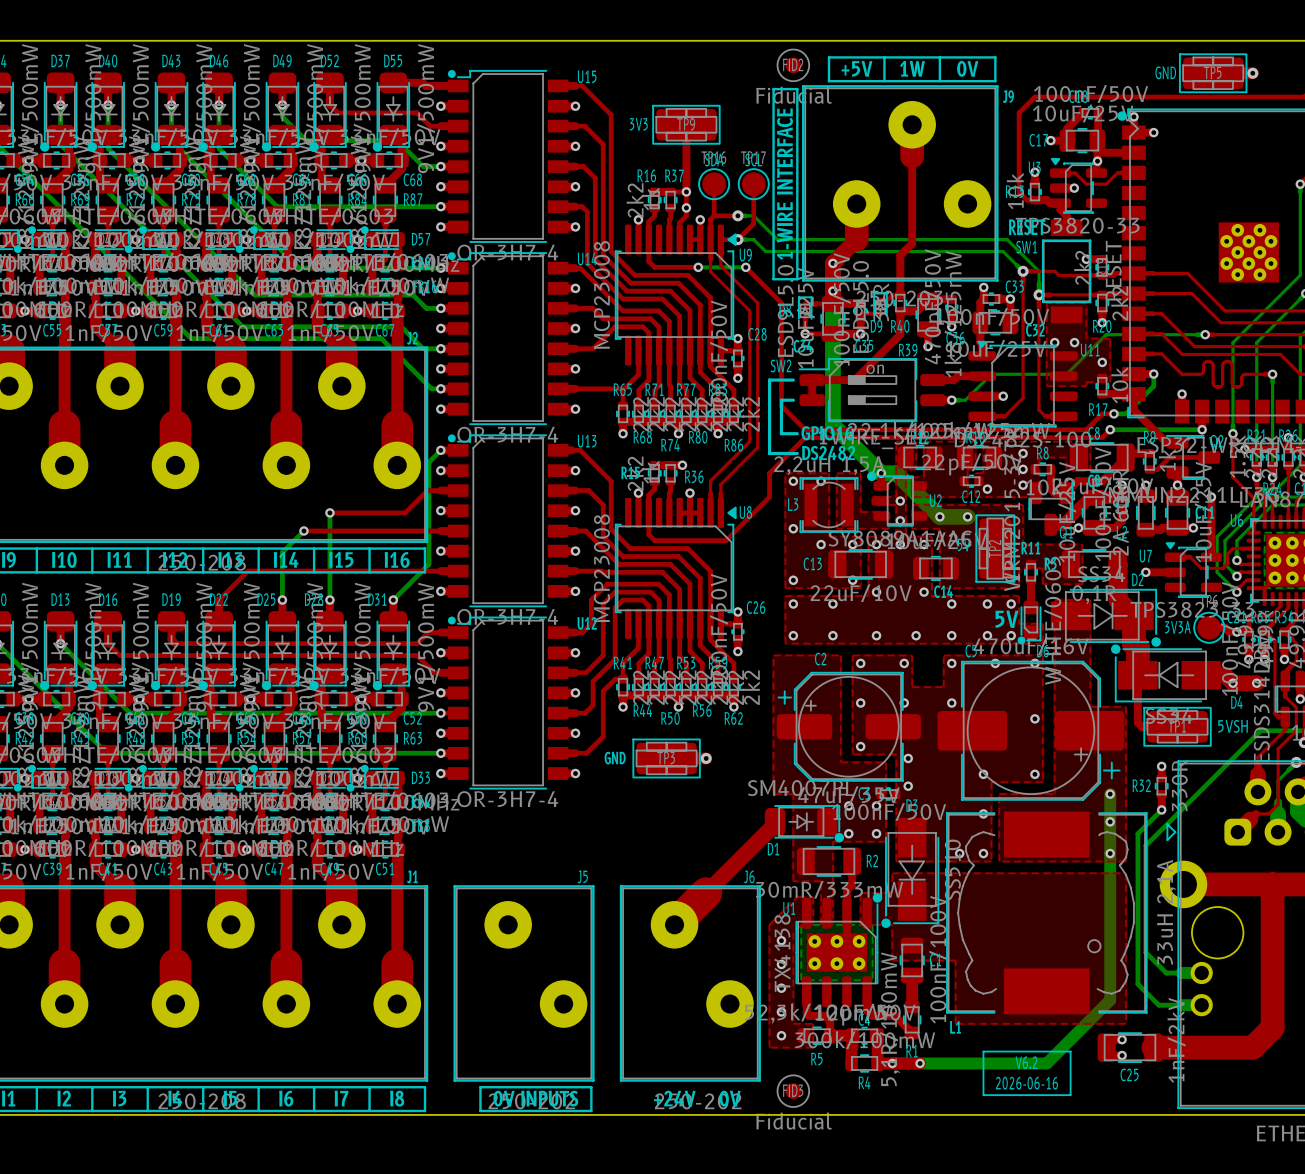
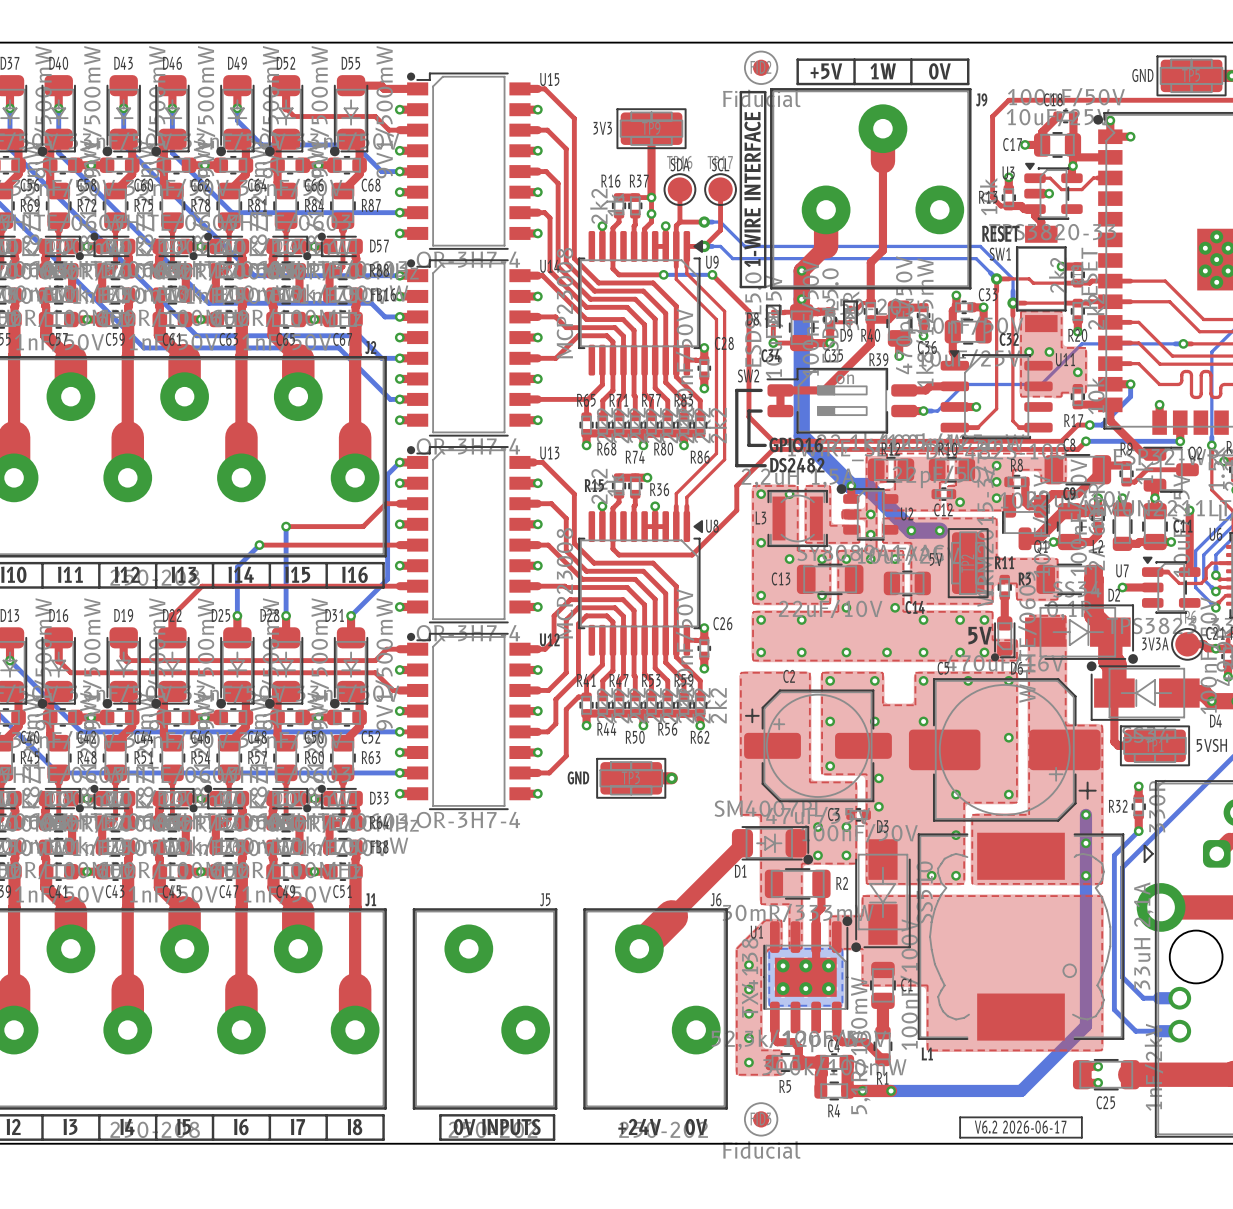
line: (983, 1051) (1070, 1051) (1070, 1095) (983, 1095) (983, 1051) -> none
text: V6.2 (1026, 1062) -> none
text: 2026-06-16 (1026, 1083) -> V6.2 2026-06-17 (1020, 1127)
line: none -> (960, 1117) (1081, 1117) (1081, 1137) (960, 1137) (960, 1117)

